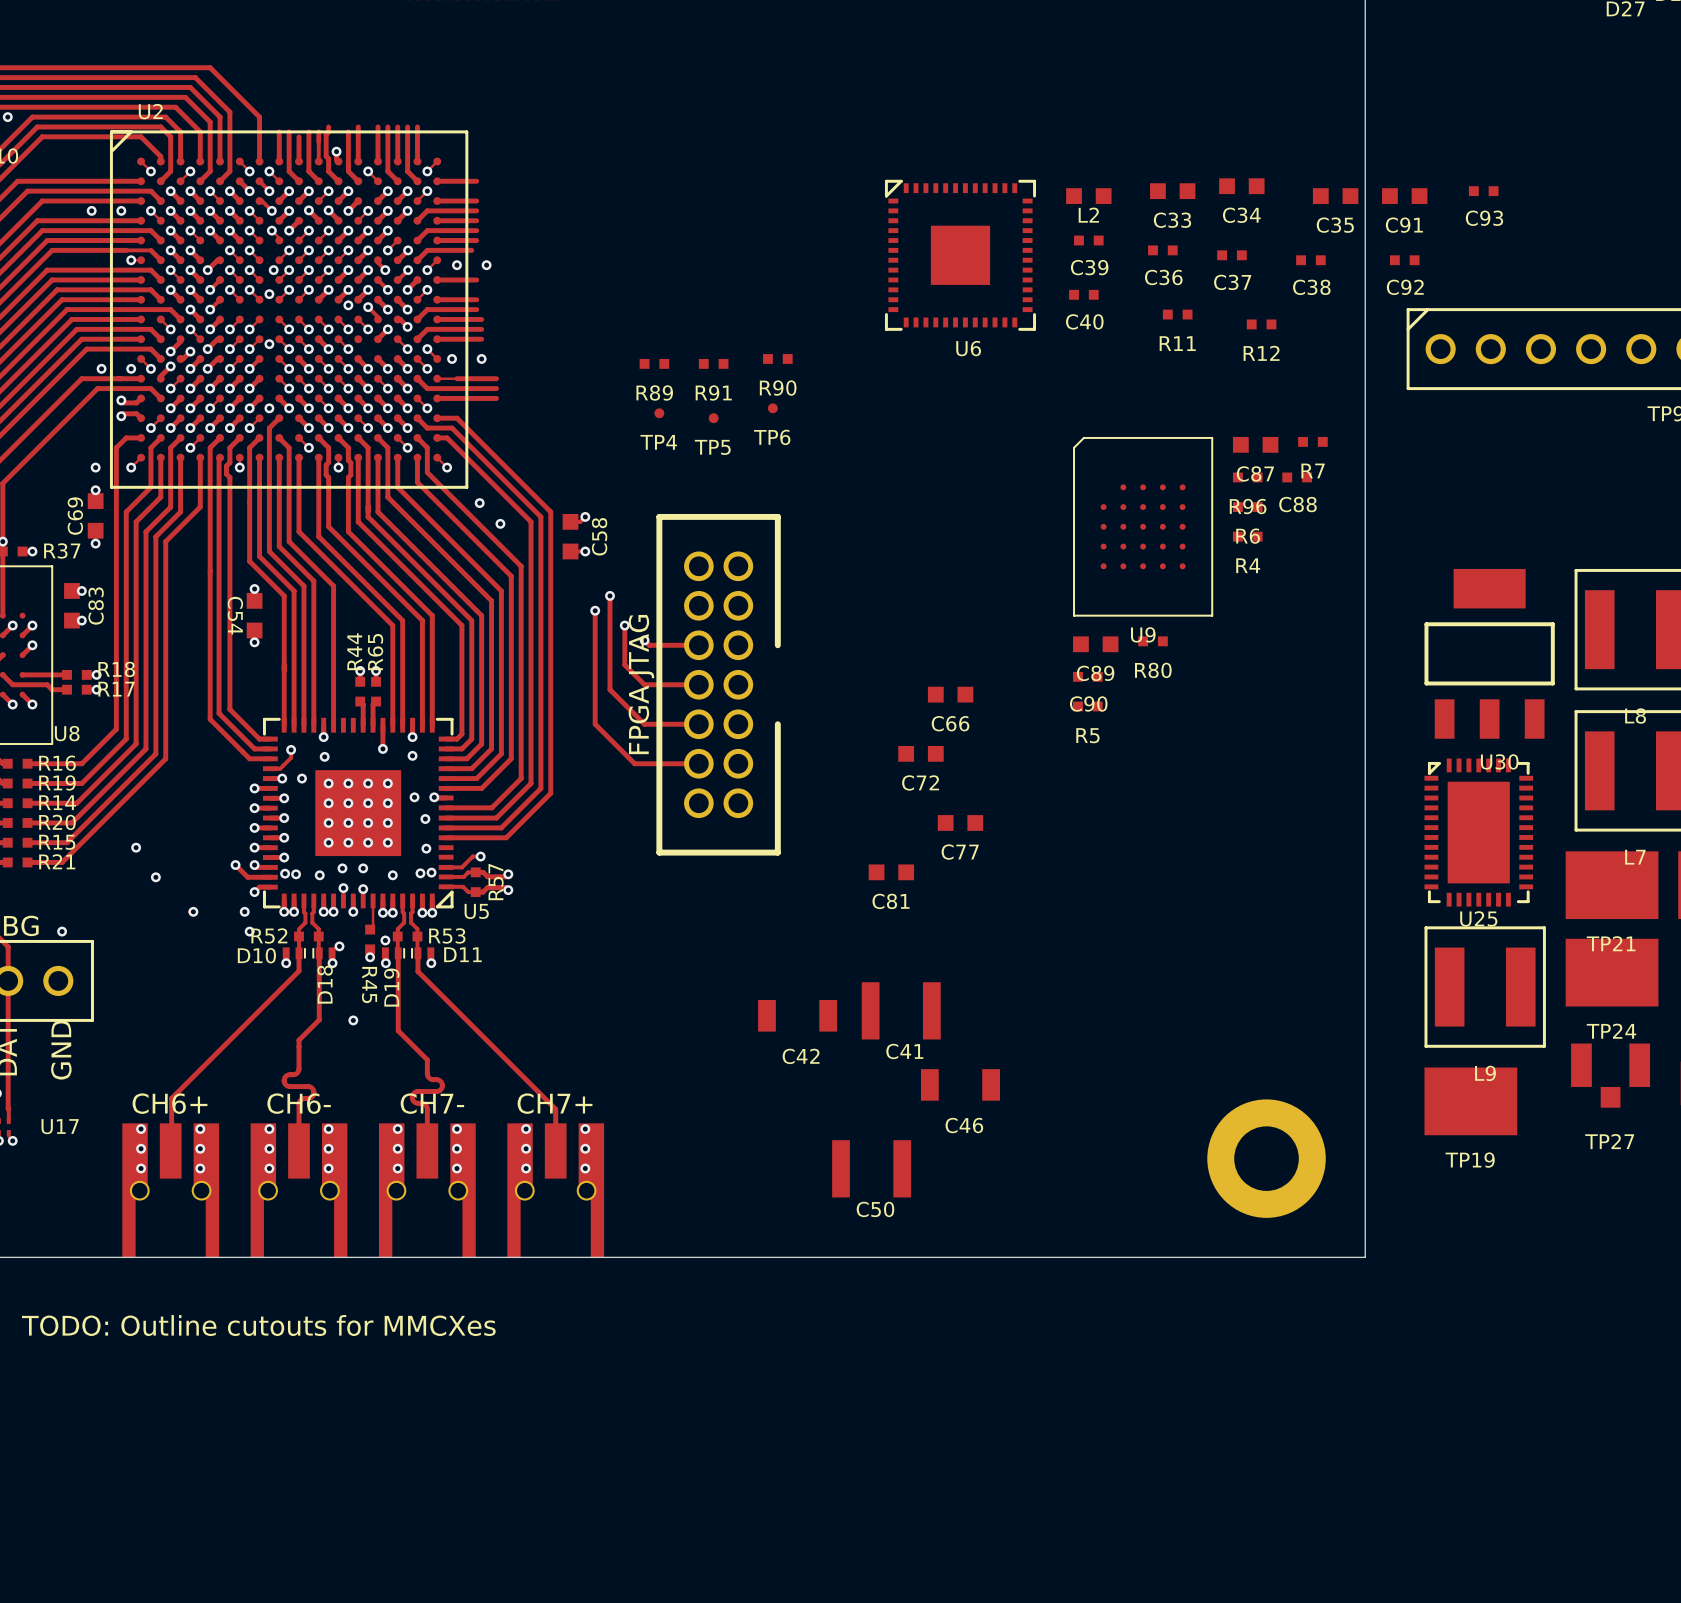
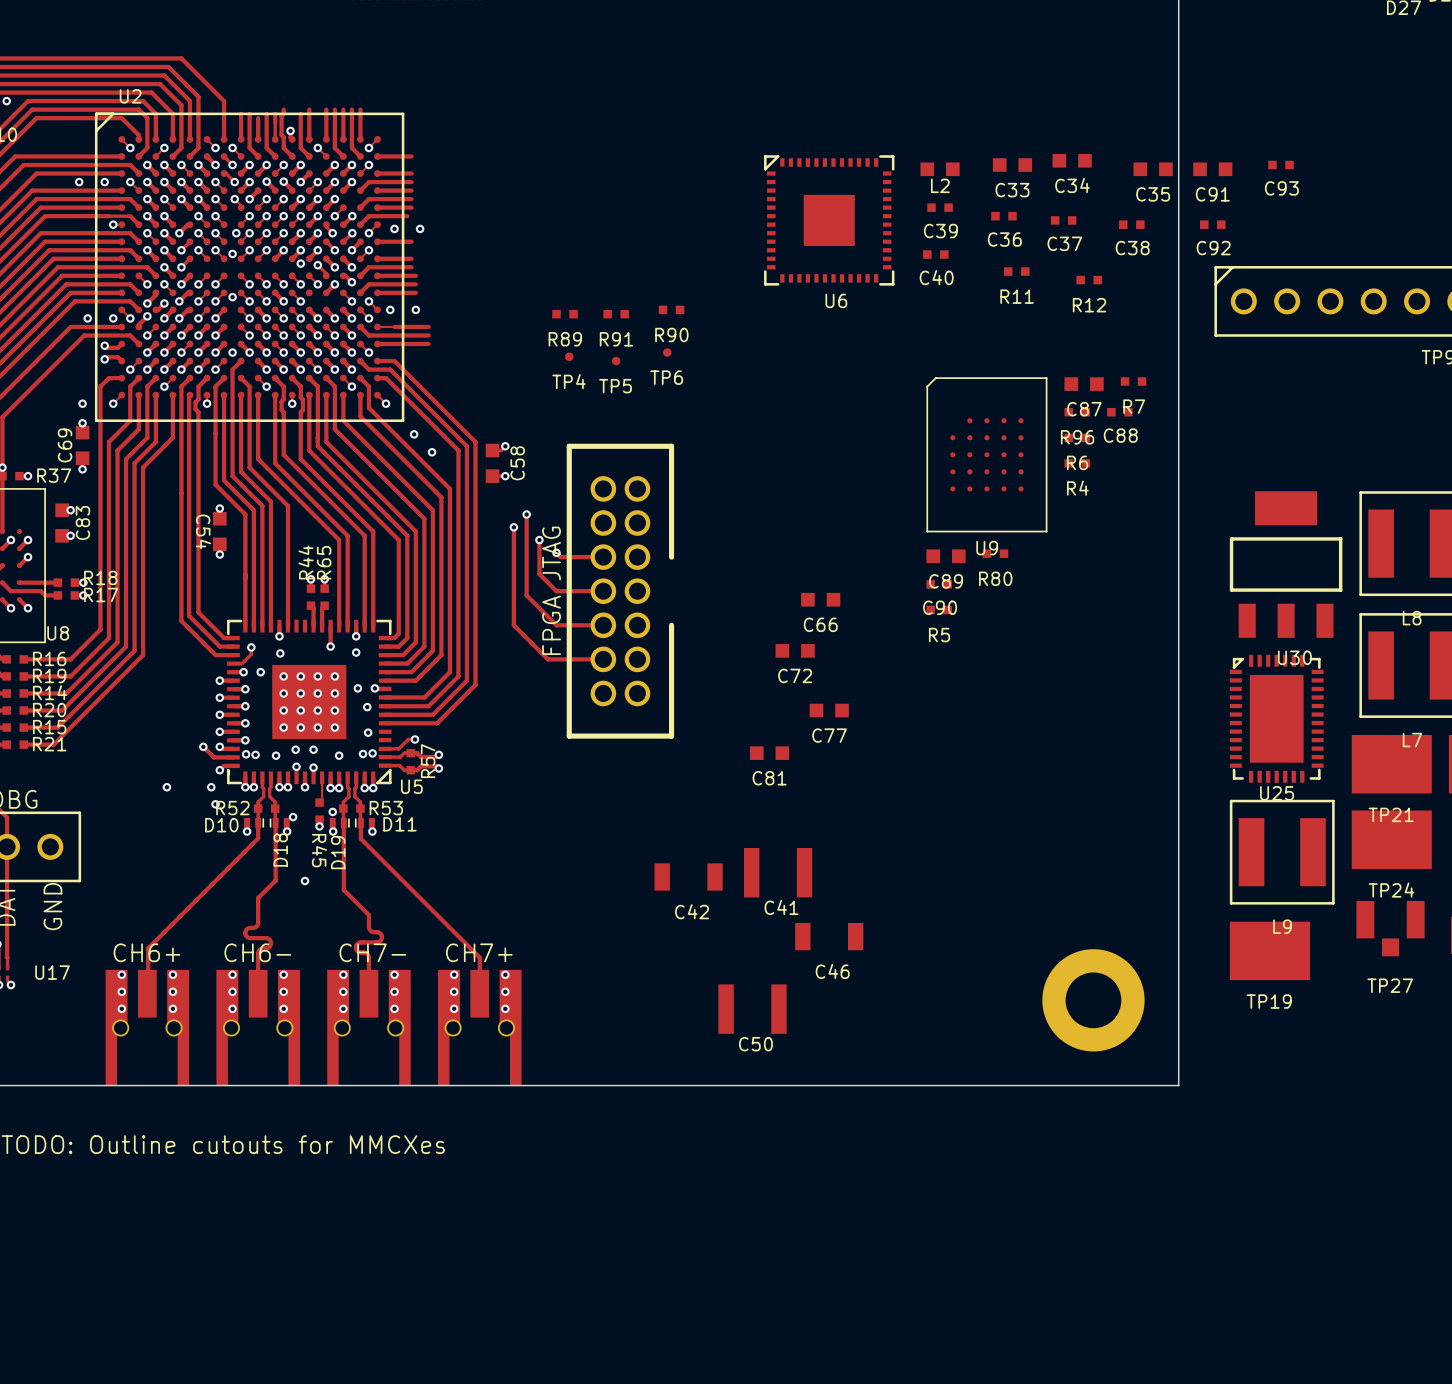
via: (136, 847) -> none
via: (155, 877) -> none
via: (62, 931) -> none

